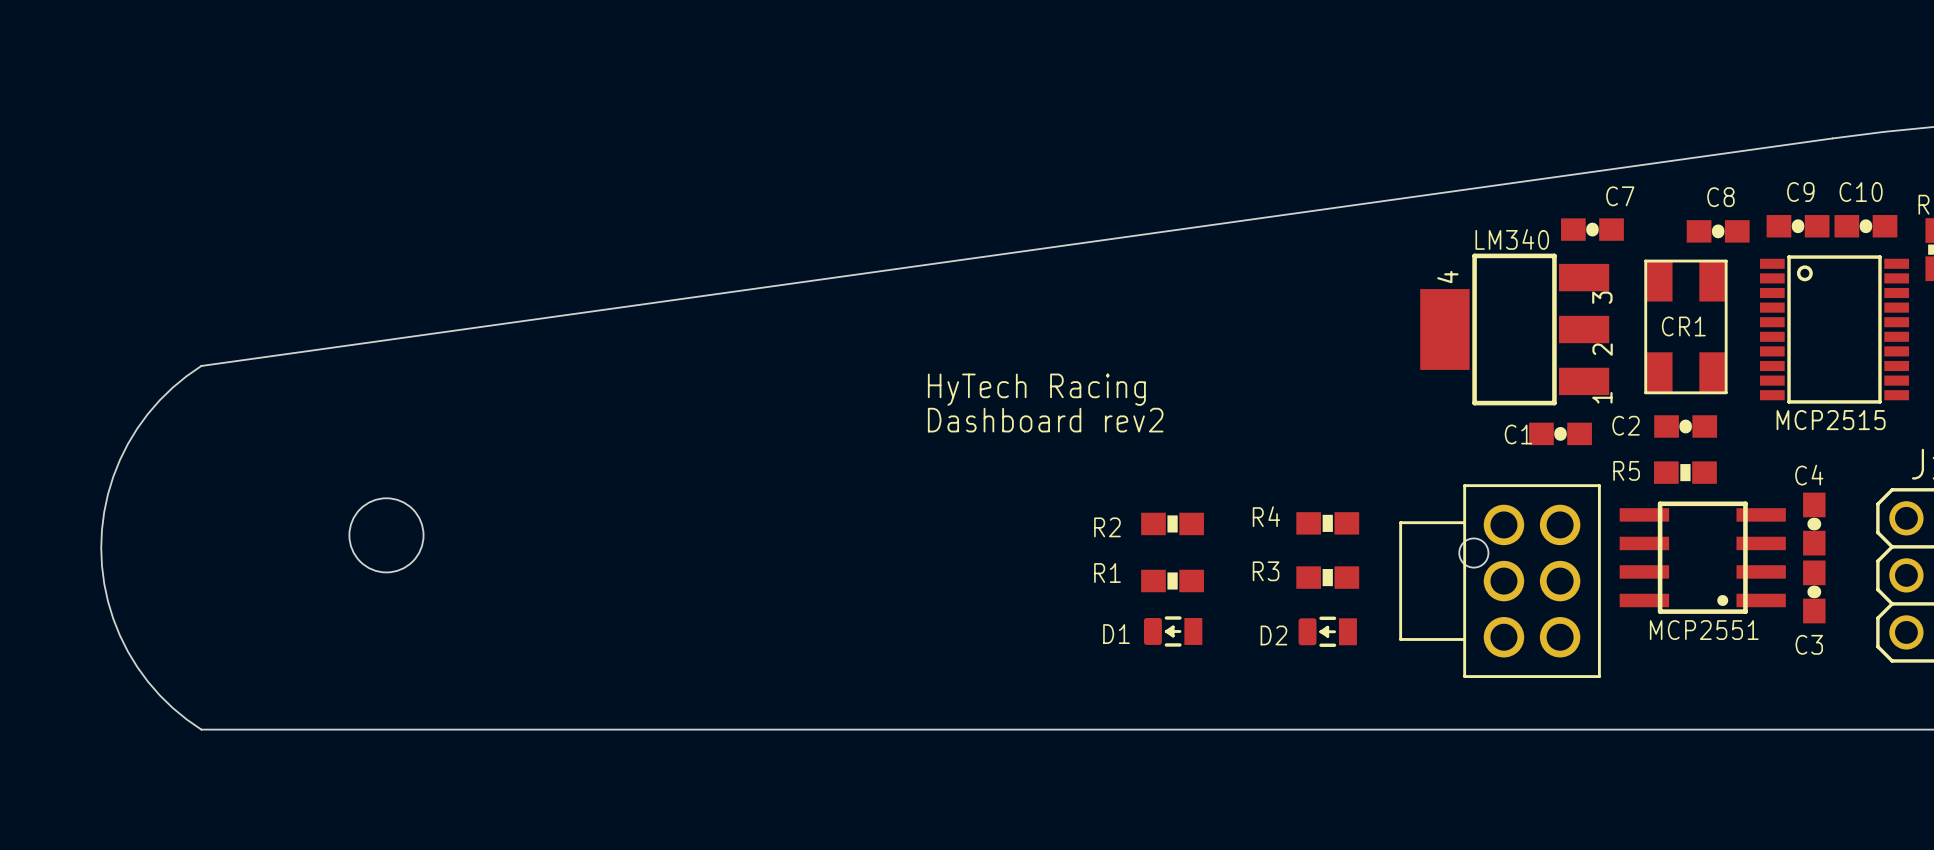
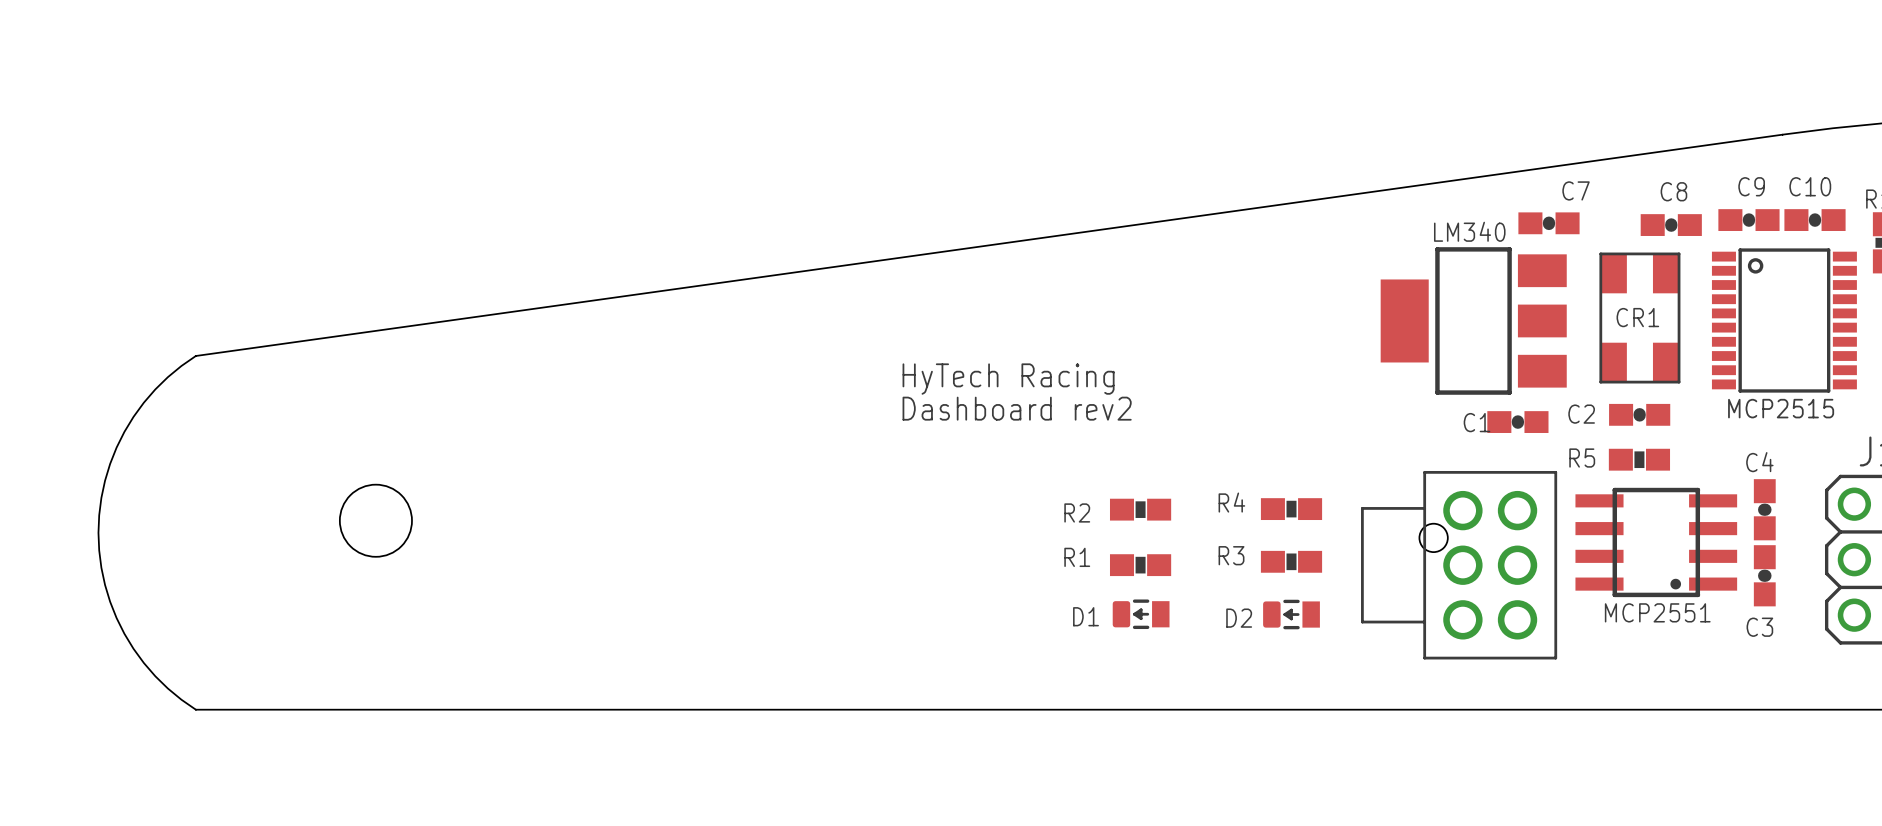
LM340 footprint: [1420, 253, 1610, 406] -> [1380, 247, 1567, 395]

